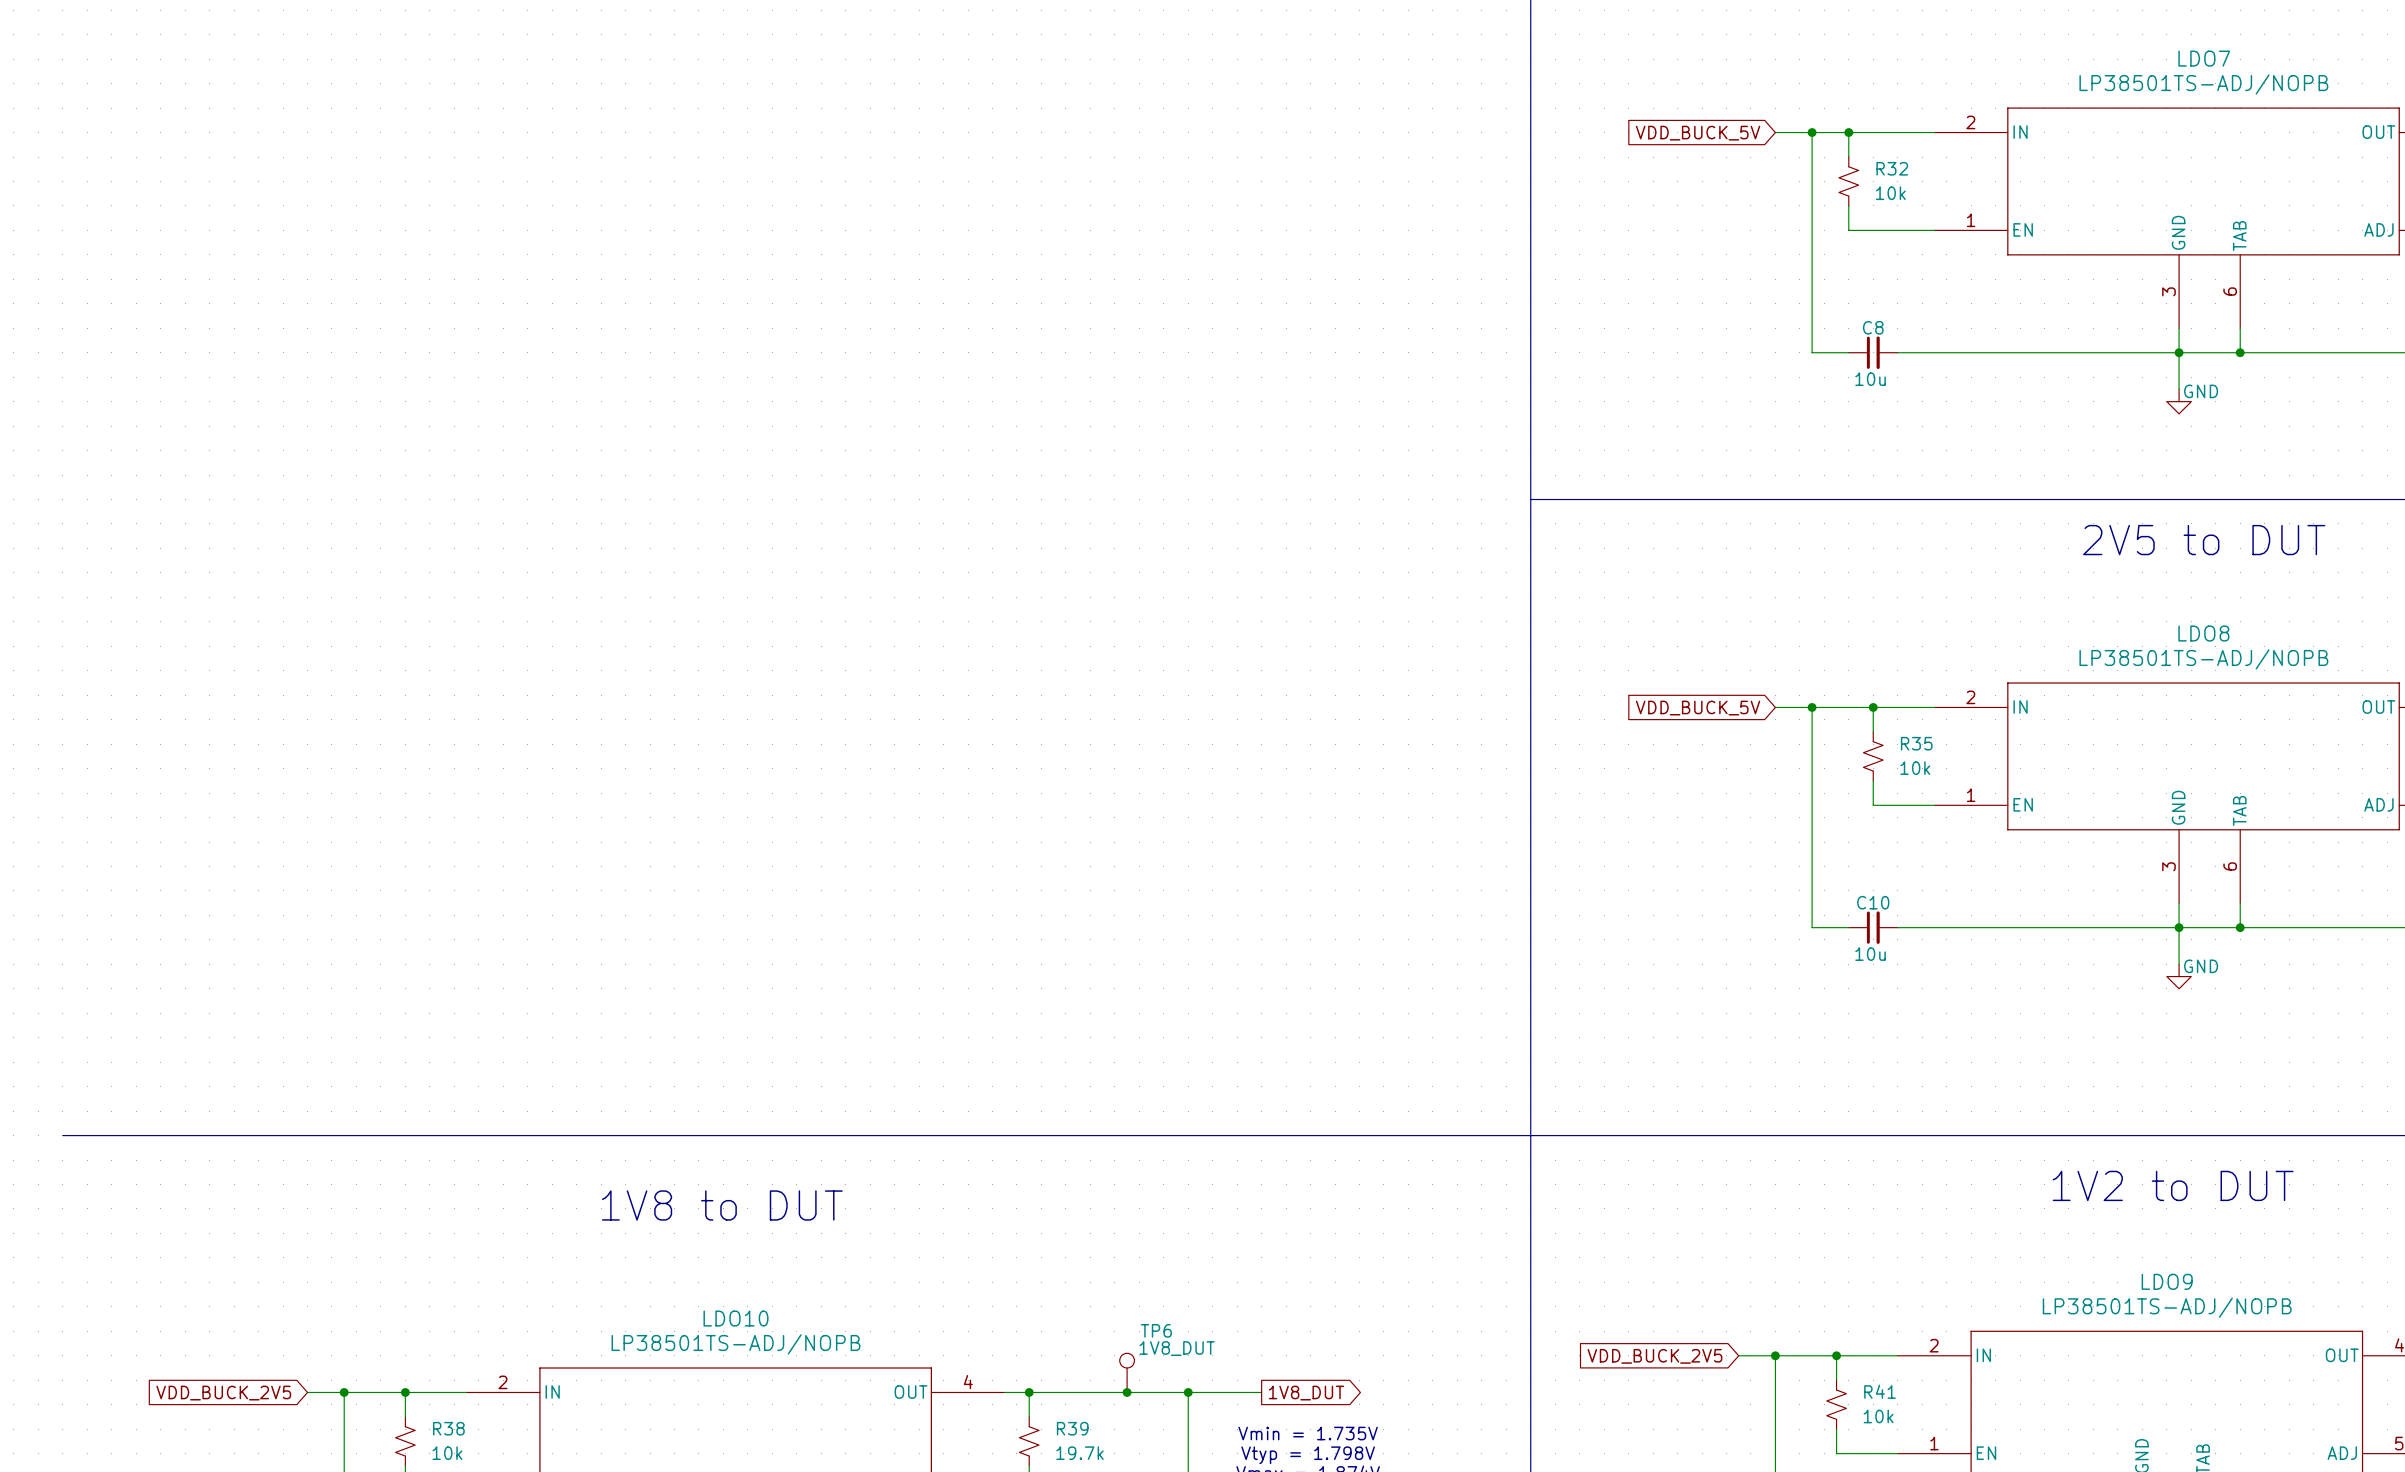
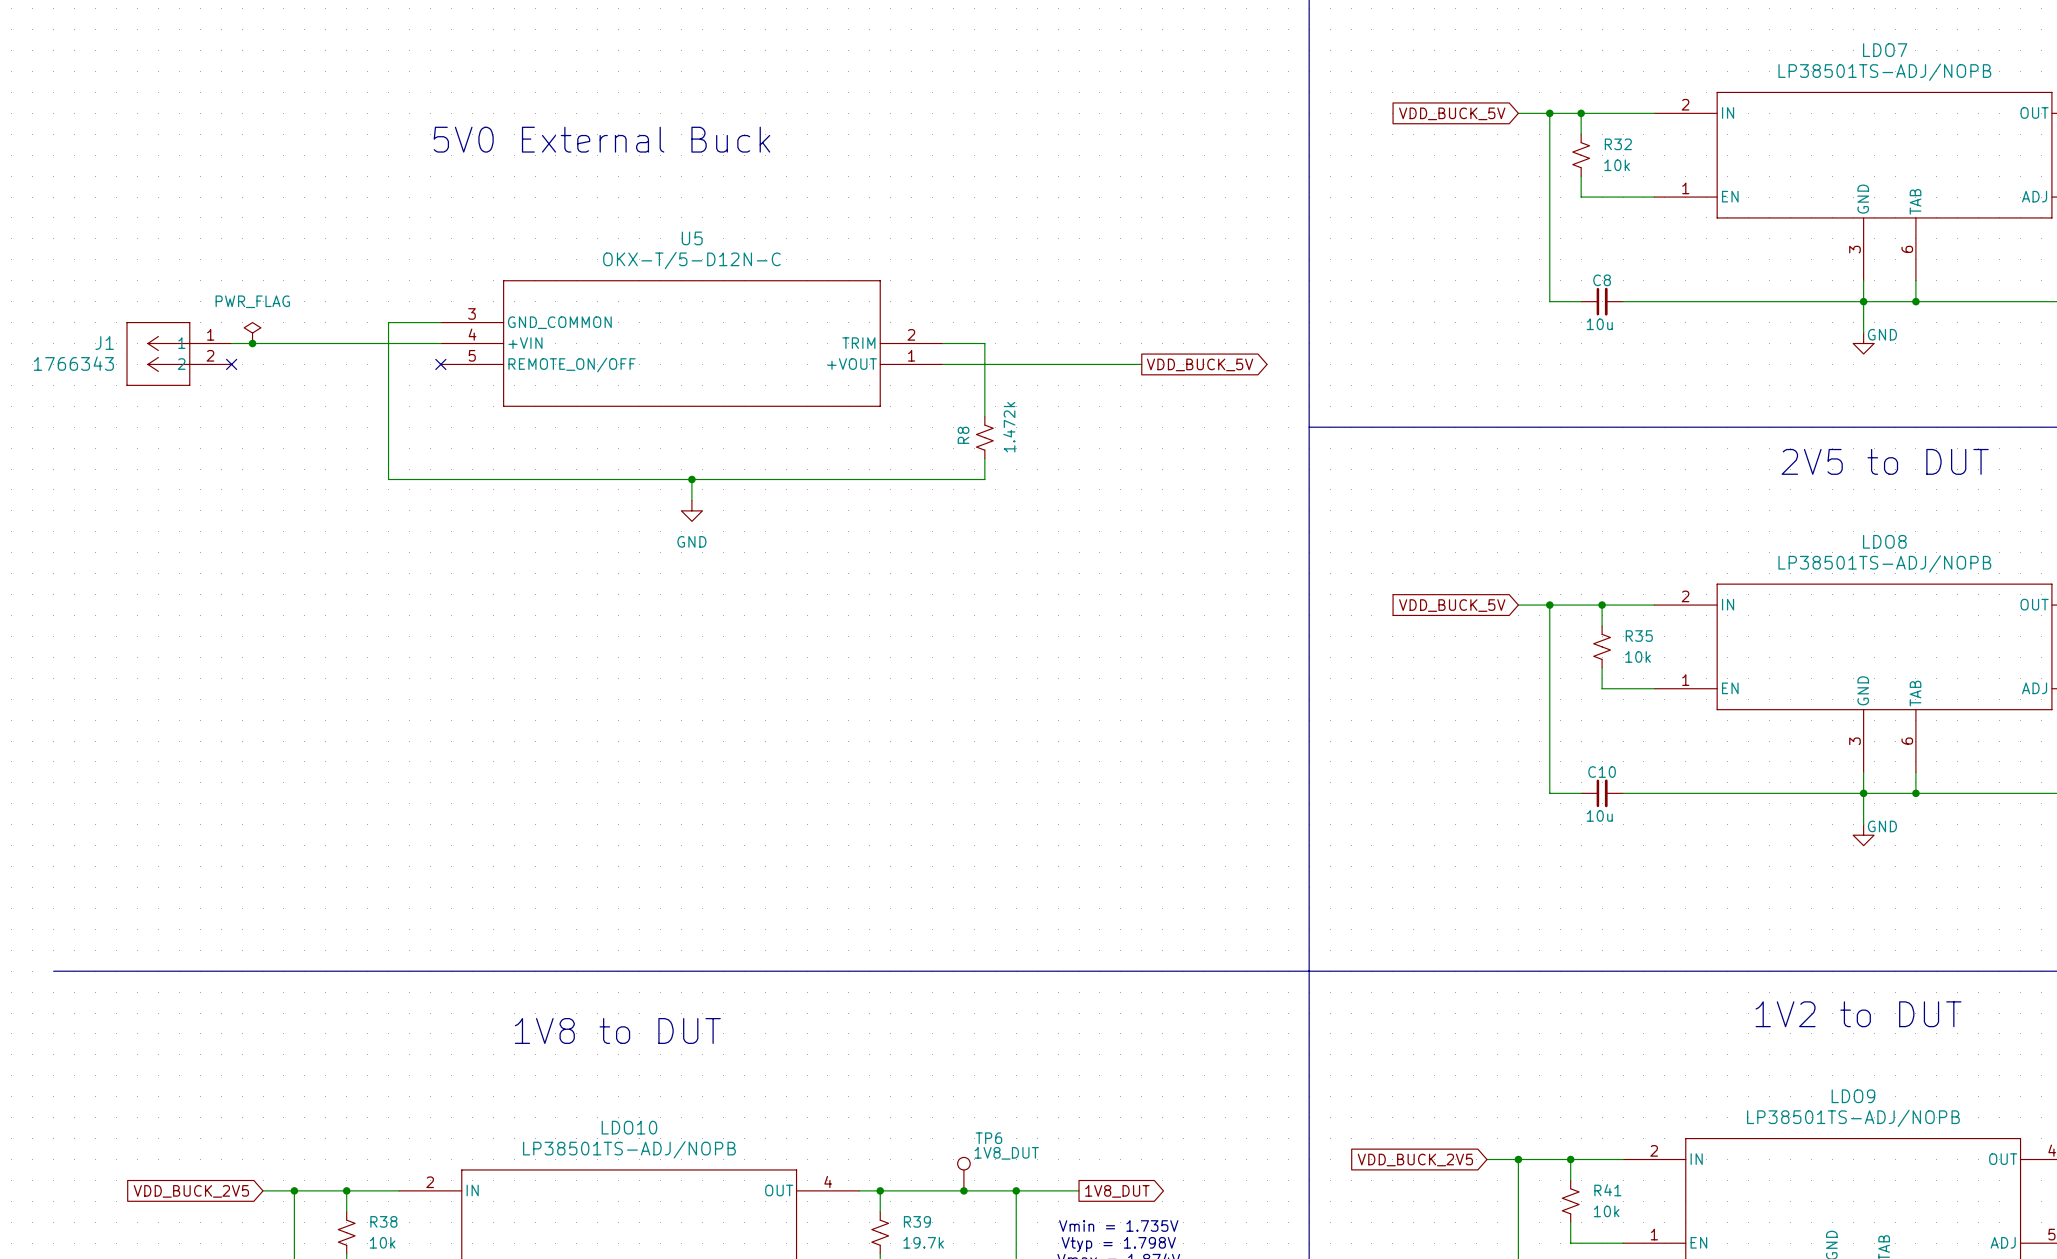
text: none -> 5V0 External Buck (601, 139)
wire: none -> (440, 322) (388, 322) (388, 479) (984, 479) (984, 458)
power symbol: none -> PWR_FLAG (252, 333)
wire: none -> (231, 343) (440, 343)
junction: none -> (252, 343)
U5: none -> OKX-T/5-D12N-C (691, 343)
wire: none -> (943, 343) (984, 343) (984, 416)
J1: none -> 1766343 (179, 353)
no-connect mark: none -> (231, 364)
no-connect mark: none -> (440, 364)
wire: none -> (943, 364) (1141, 364)
global label: none -> VDD_BUCK_5V (1200, 364)
R8: none -> 1.472k (984, 437)
wire: none -> (691, 479) (691, 500)
junction: none -> (691, 479)
power symbol: none -> GND (691, 510)

